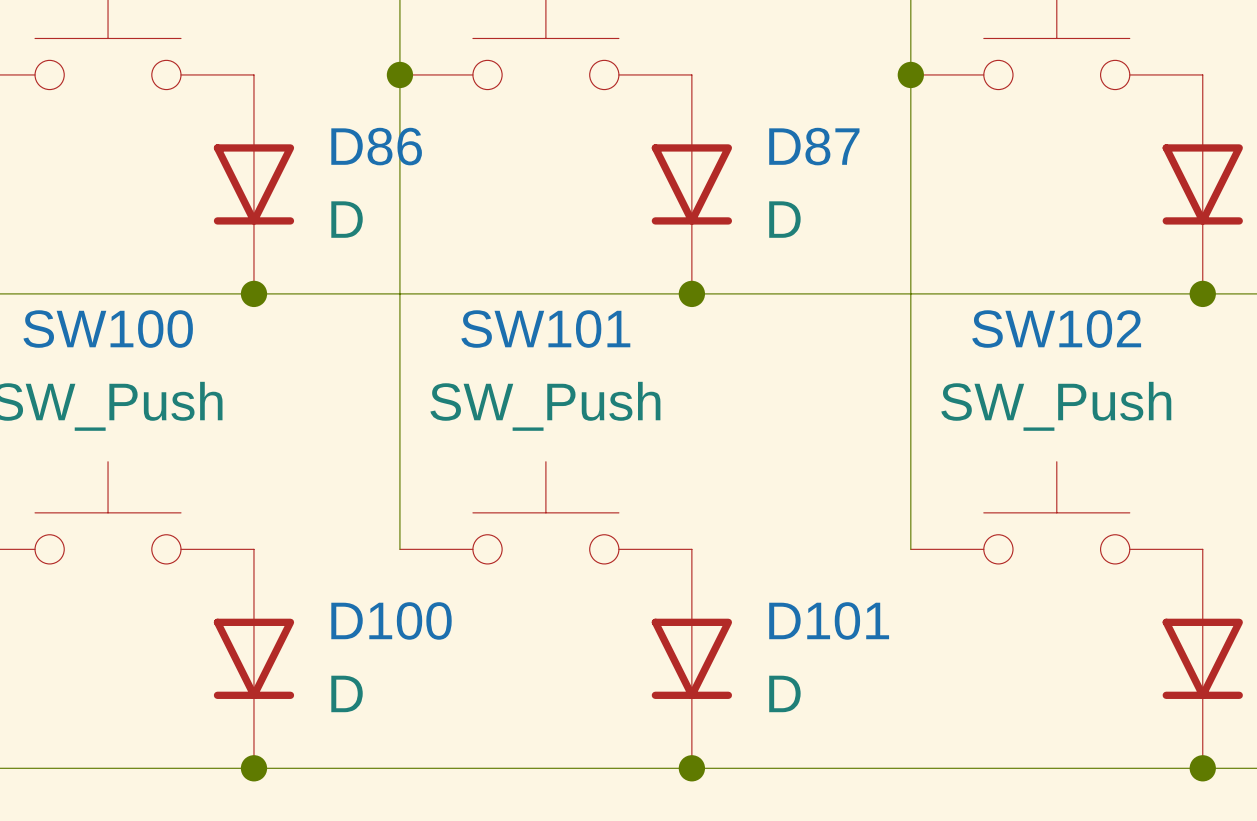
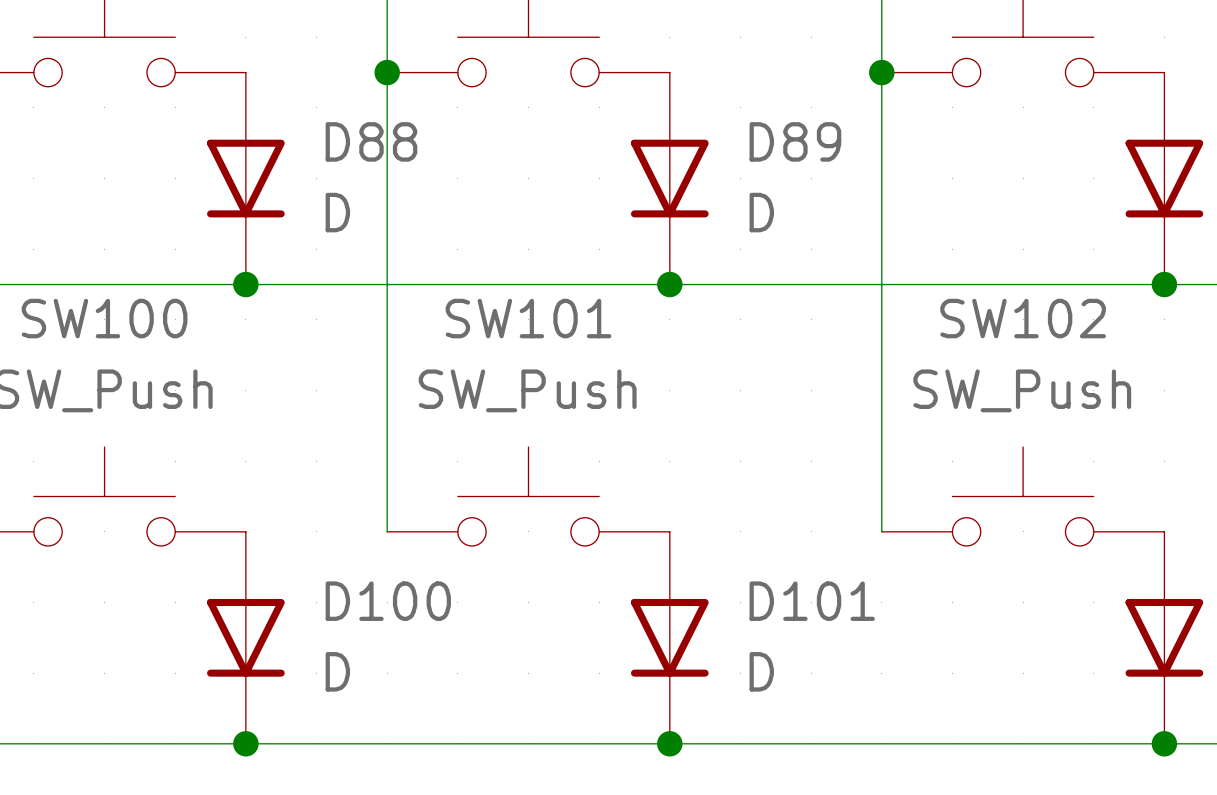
D86 name: D86 (376, 146) -> D88 (371, 141)
D87 name: D87 (814, 146) -> D89 (795, 141)

